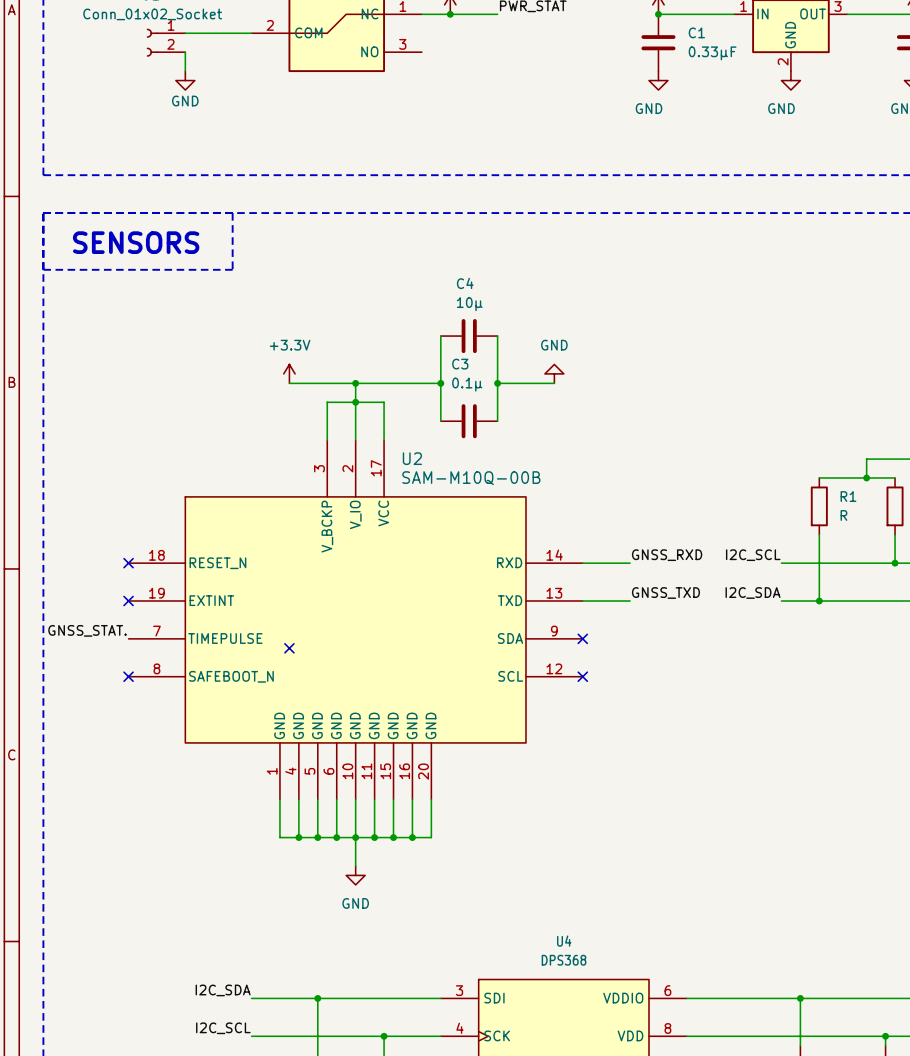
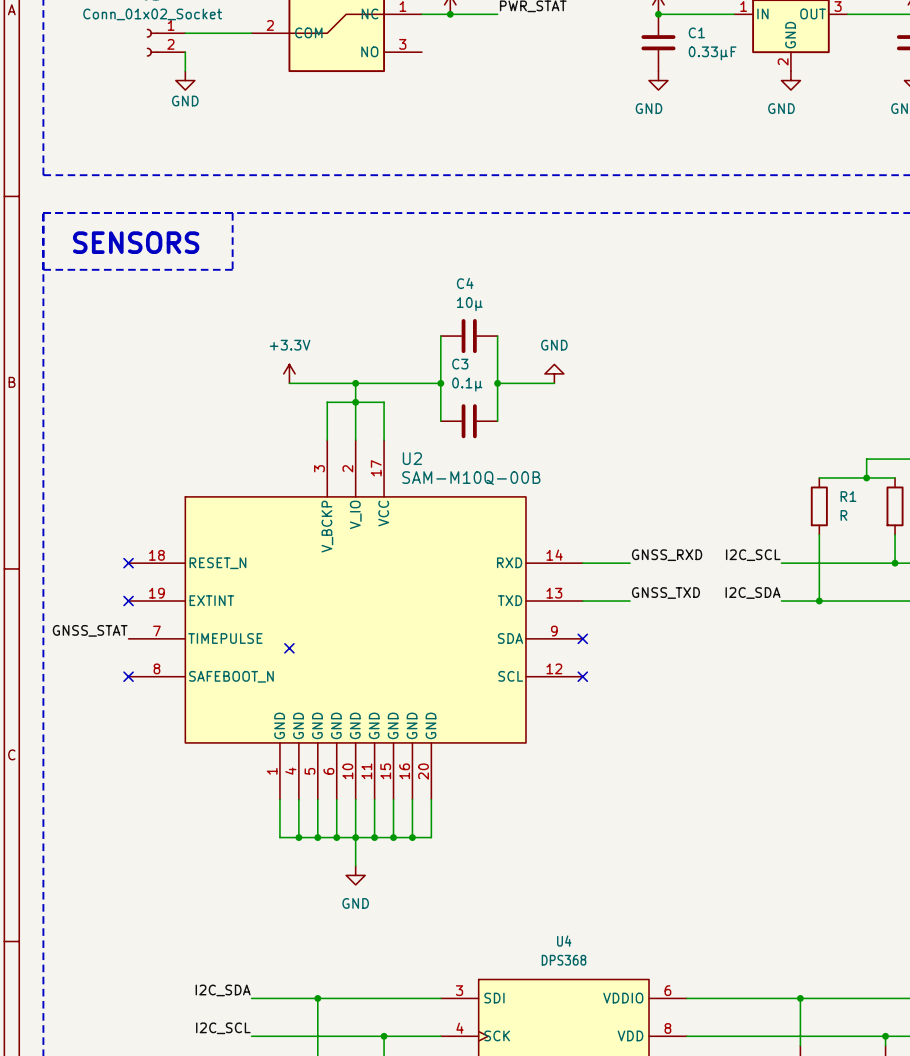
label: GNSS_STAT. (87, 630) -> GNSS_STAT (90, 630)

